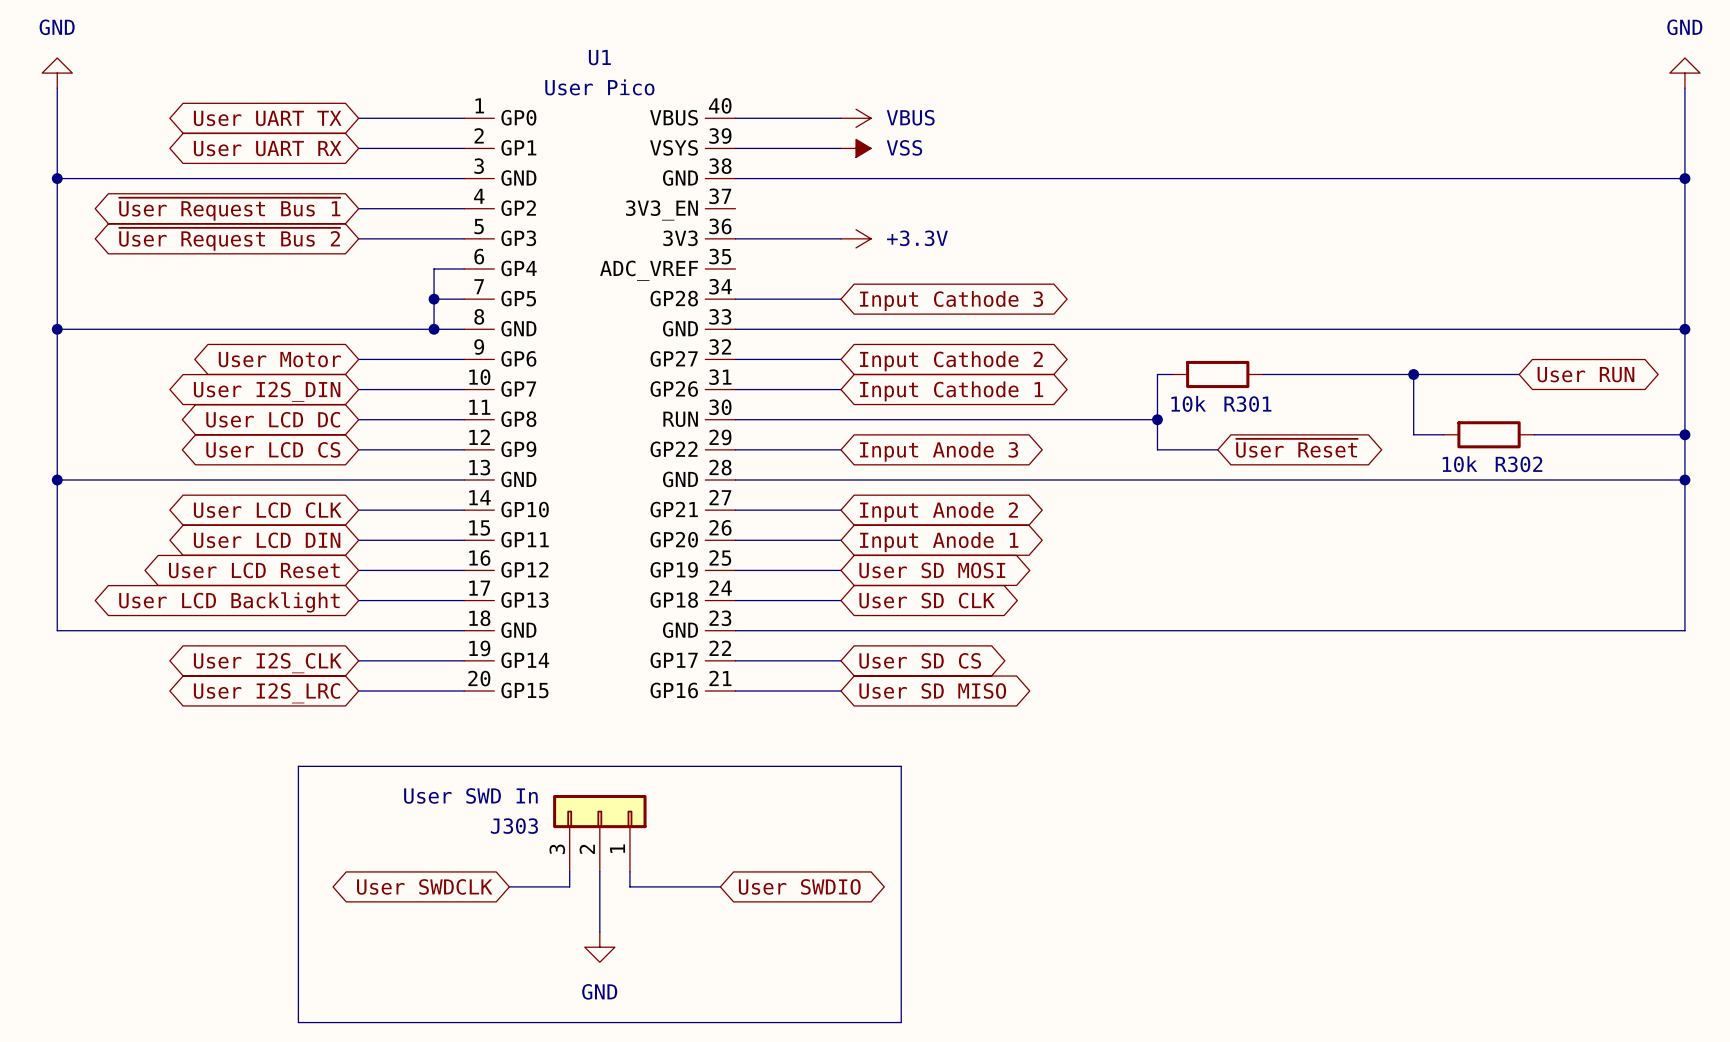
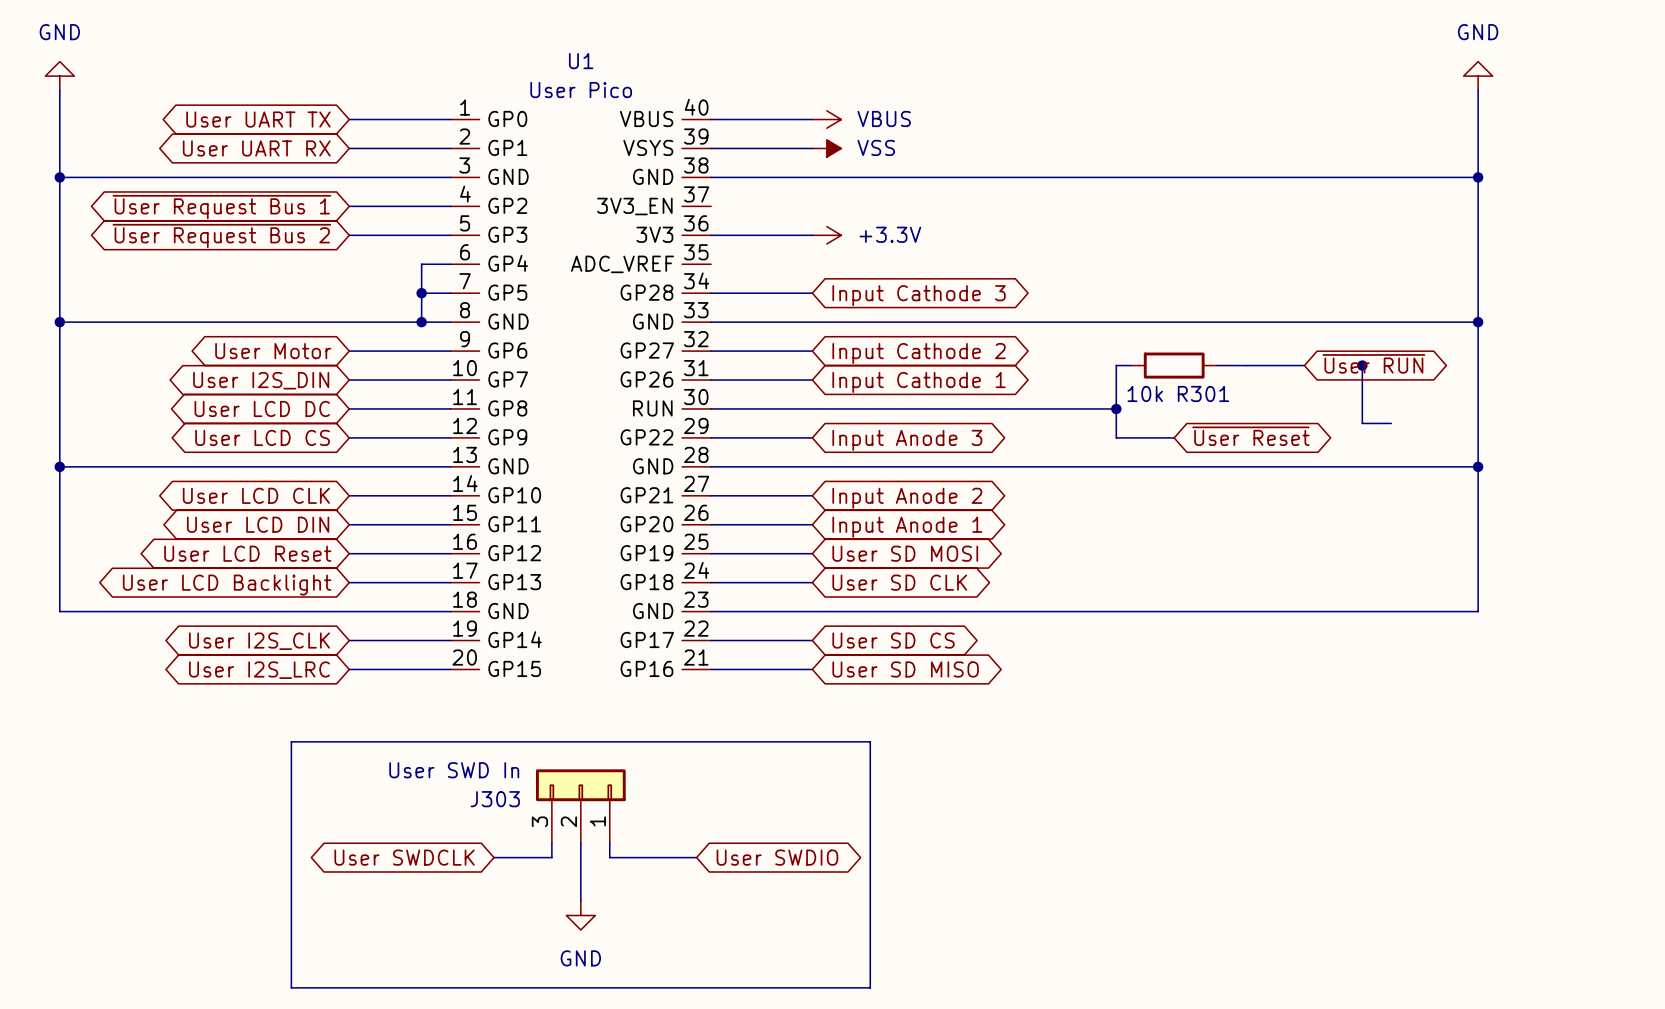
power symbol position: GND (1684, 73) -> GND (1478, 76)
wire: (1684, 88) (1684, 630) (1534, 630) -> (1478, 90) (1478, 611)
wire: (1534, 178) (1684, 178) -> none
junction: none -> (1478, 177)
junction: (1684, 178) -> none
wire: (1534, 329) (1684, 329) -> none
junction: none -> (1478, 322)
junction: (1684, 329) -> none
wire: (1353, 374) (1519, 374) -> none
global label: User RUN (1585, 374) -> ~{User RUN} (1373, 363)
R302: 10k (1489, 434) -> none
wire: (1534, 434) (1684, 434) -> none
junction: (1684, 434) -> none
wire: (1534, 480) (1684, 480) -> none
junction: none -> (1478, 466)
junction: (1684, 480) -> none

